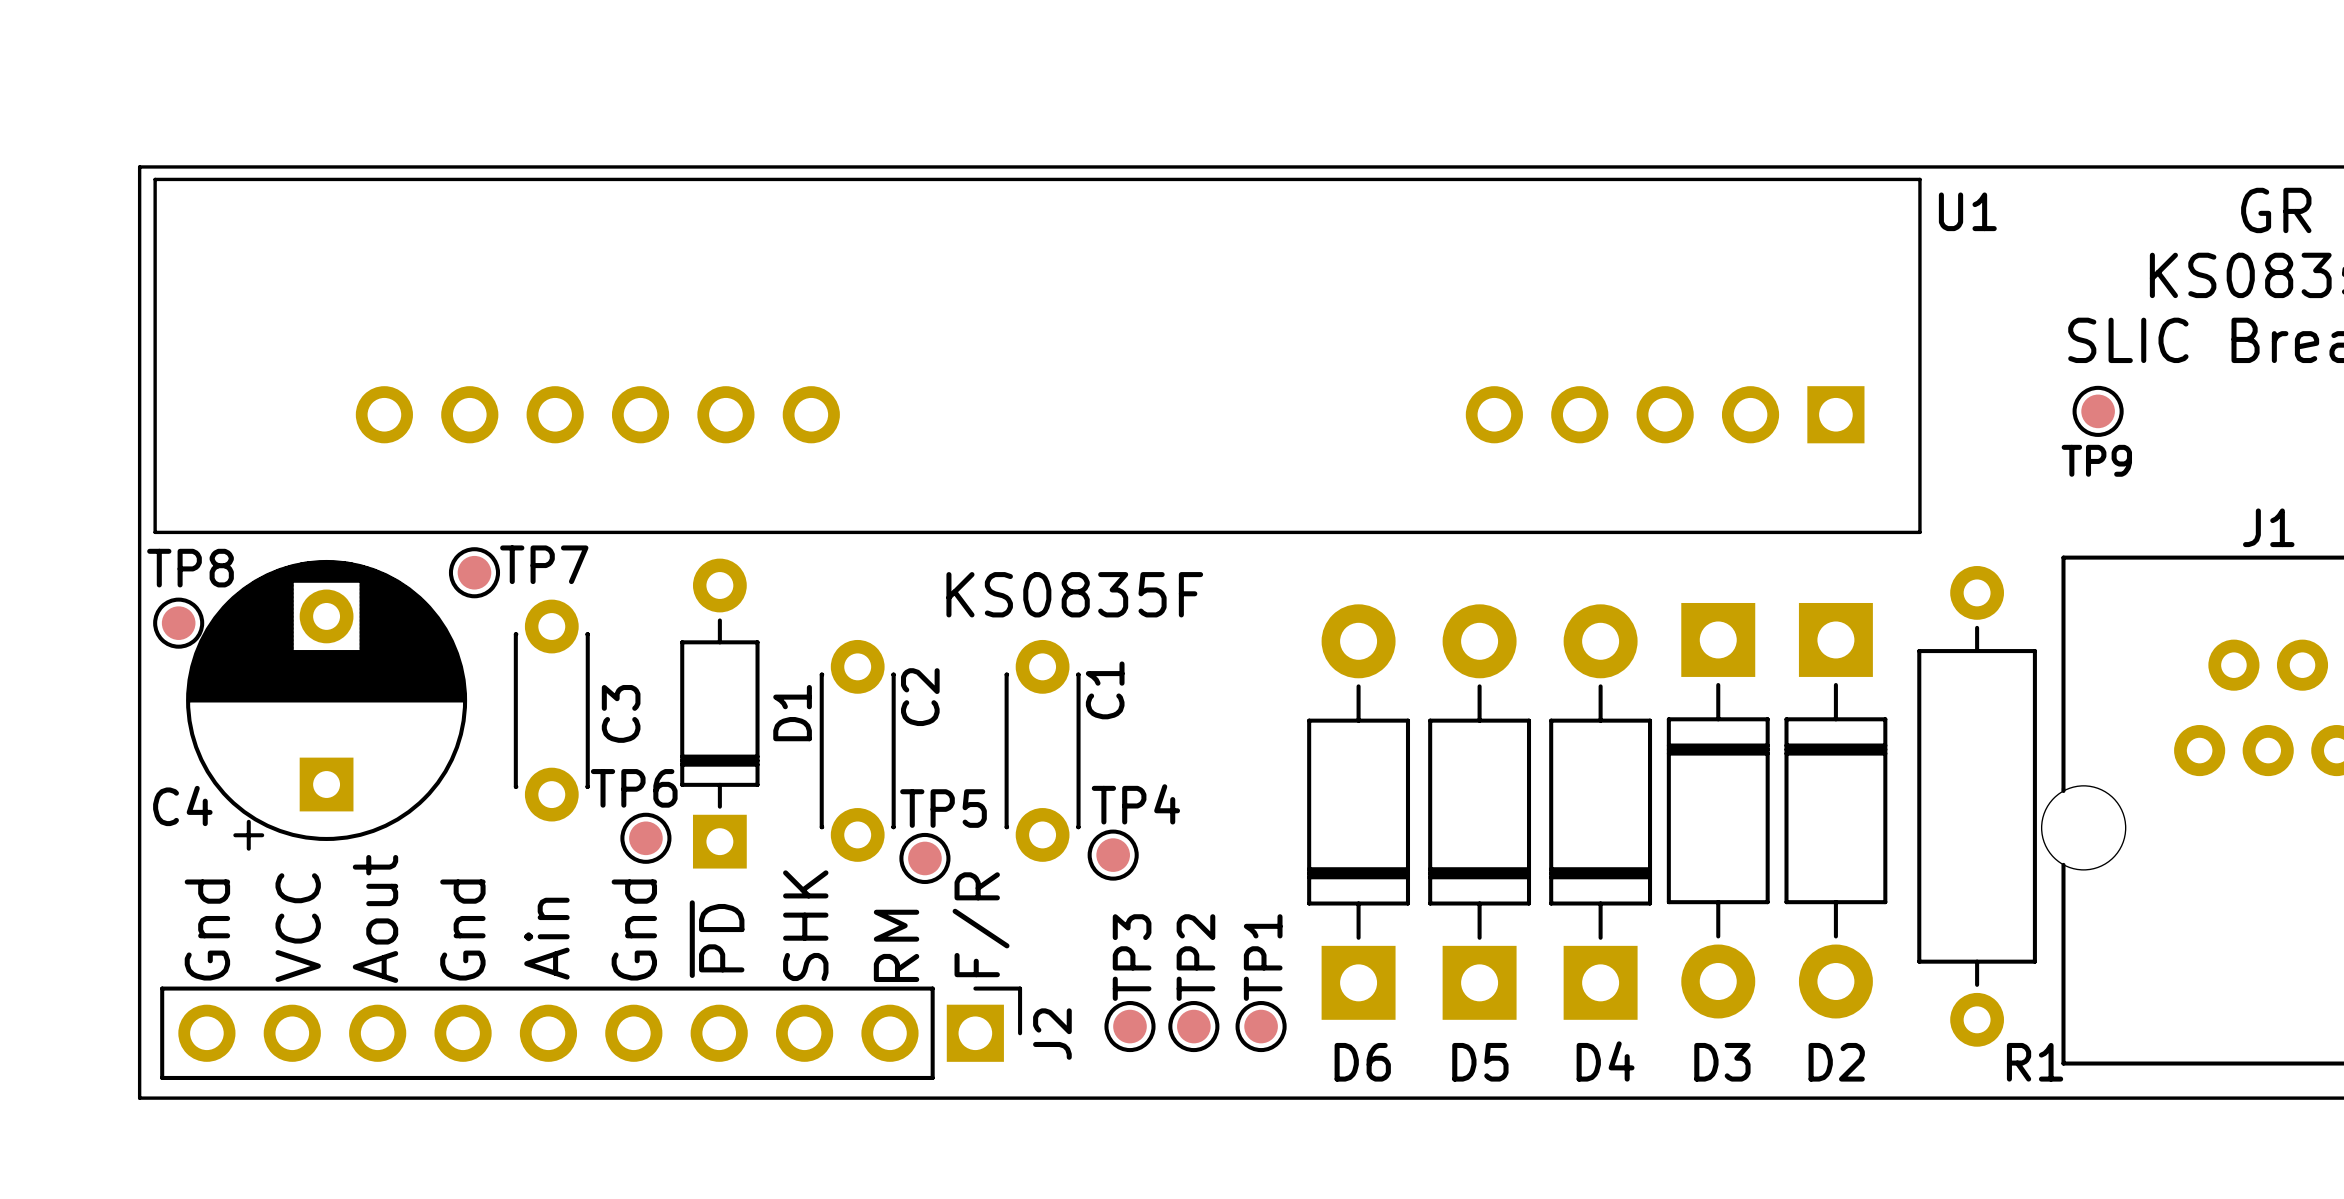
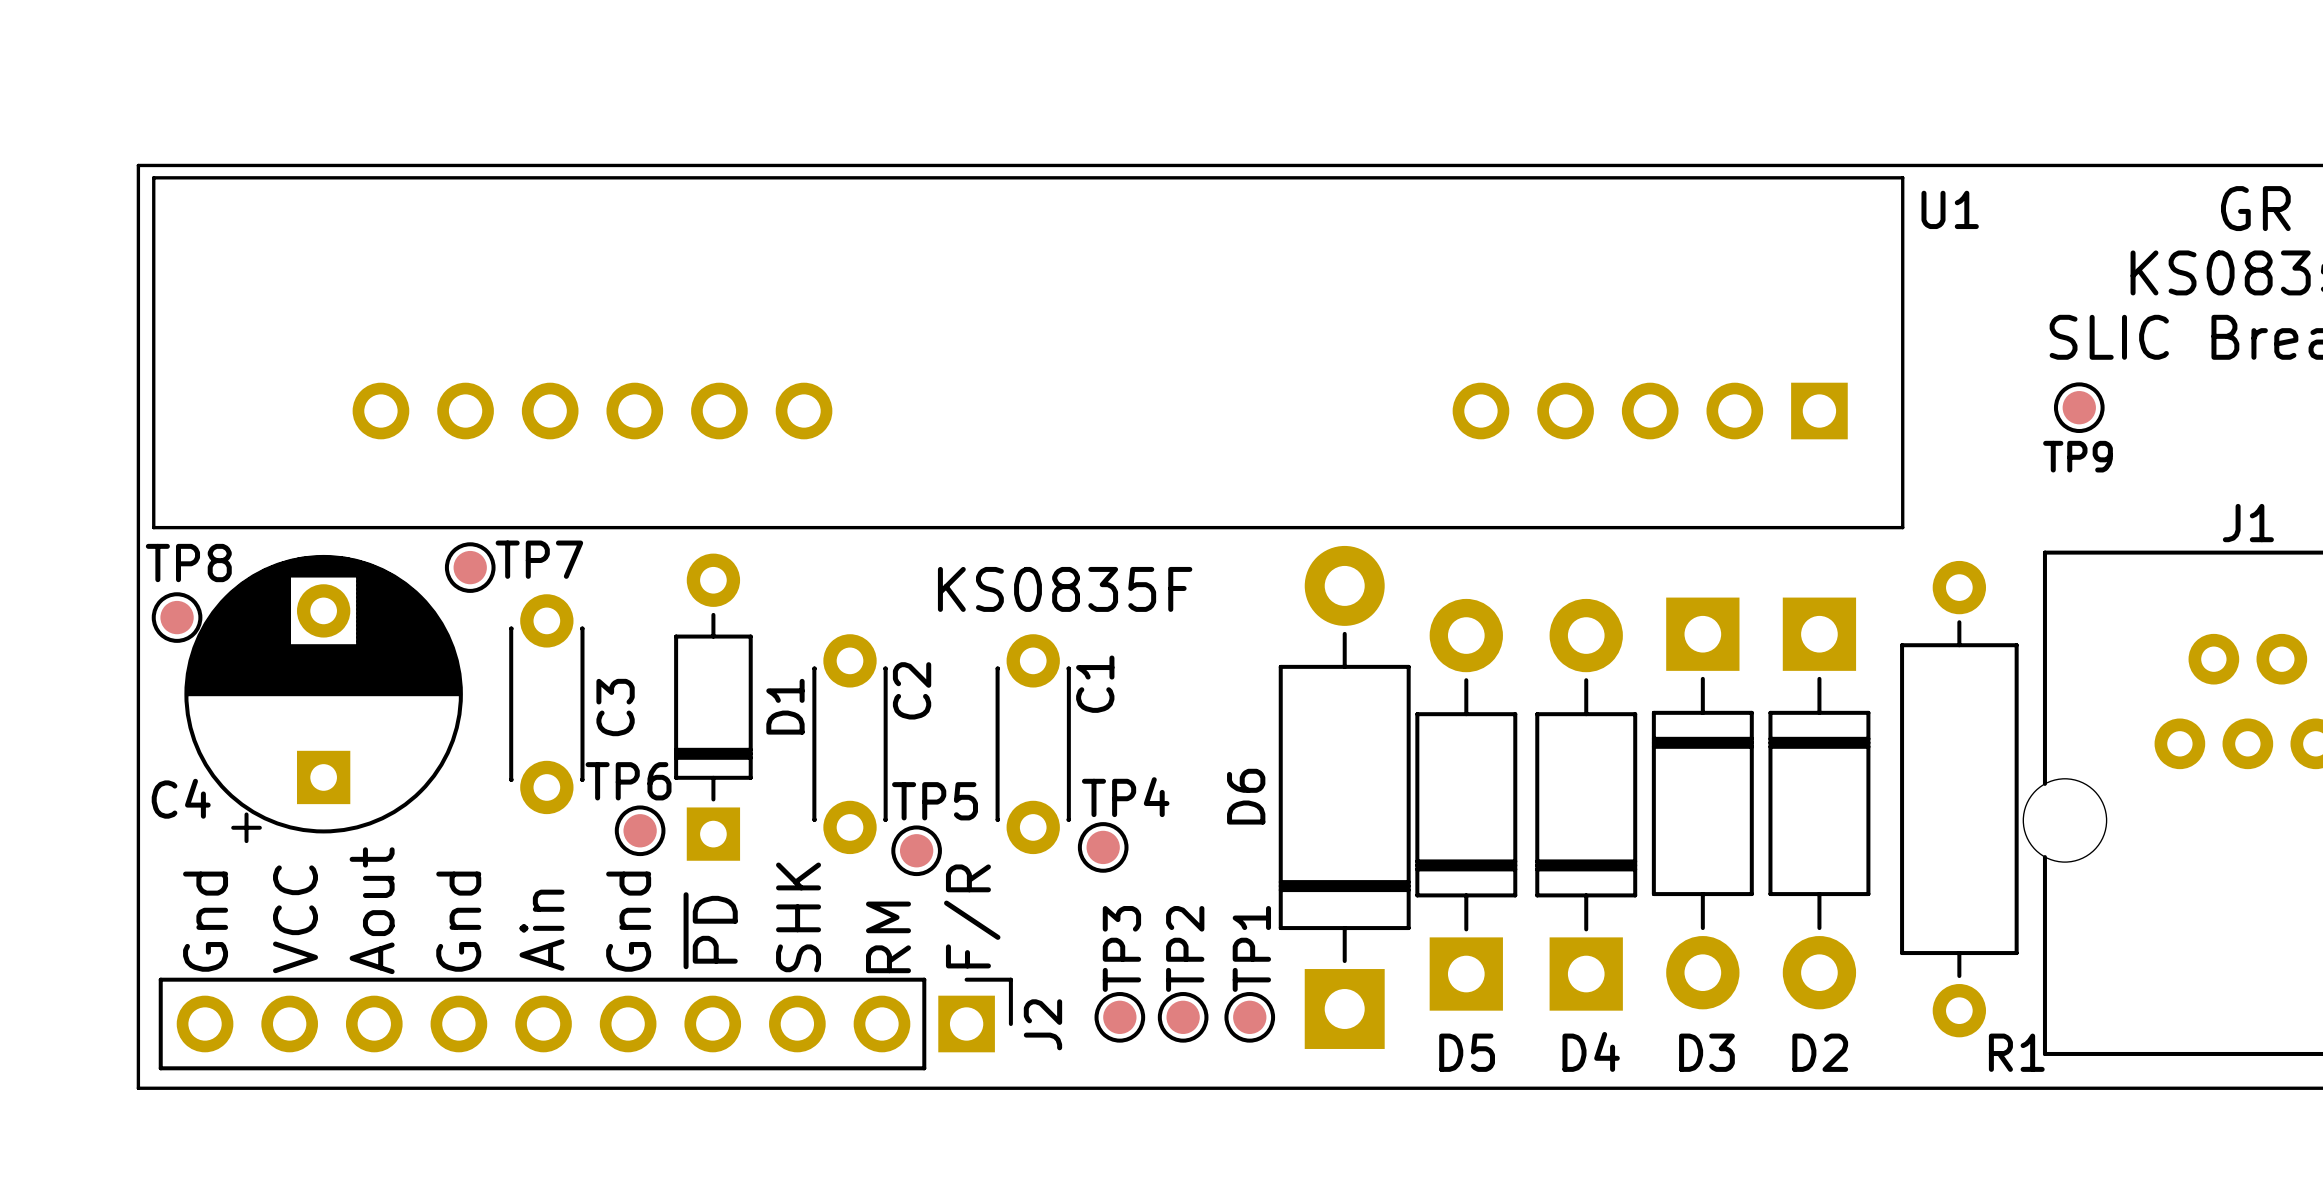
D6 footprint: [1307, 604, 1411, 1020] -> [1278, 545, 1411, 1049]
D6 name position: D6 (1362, 1062) -> D6 (1246, 796)

